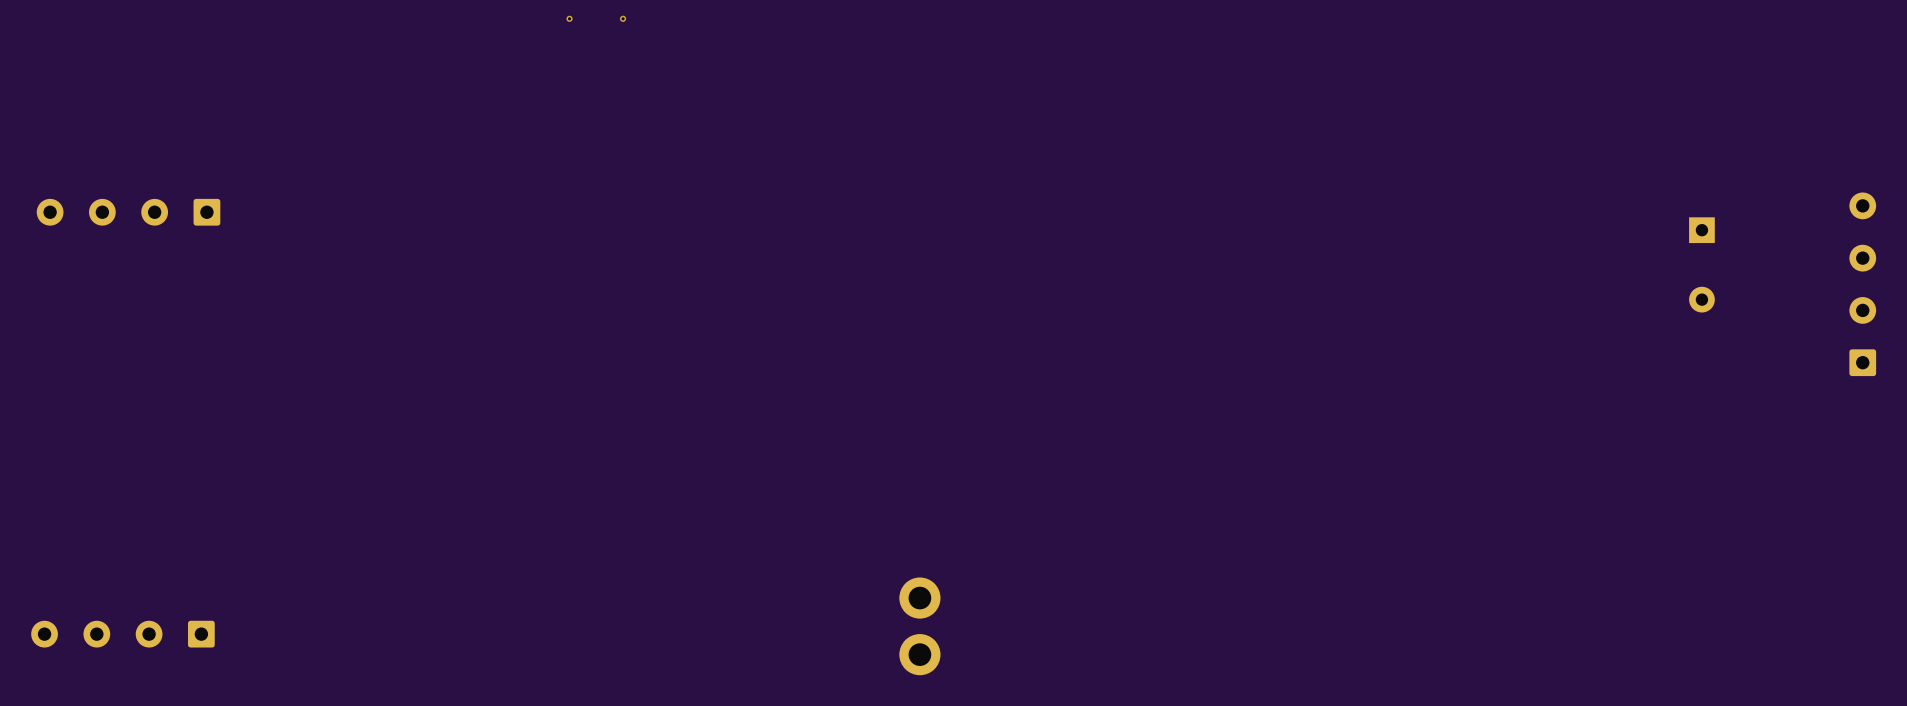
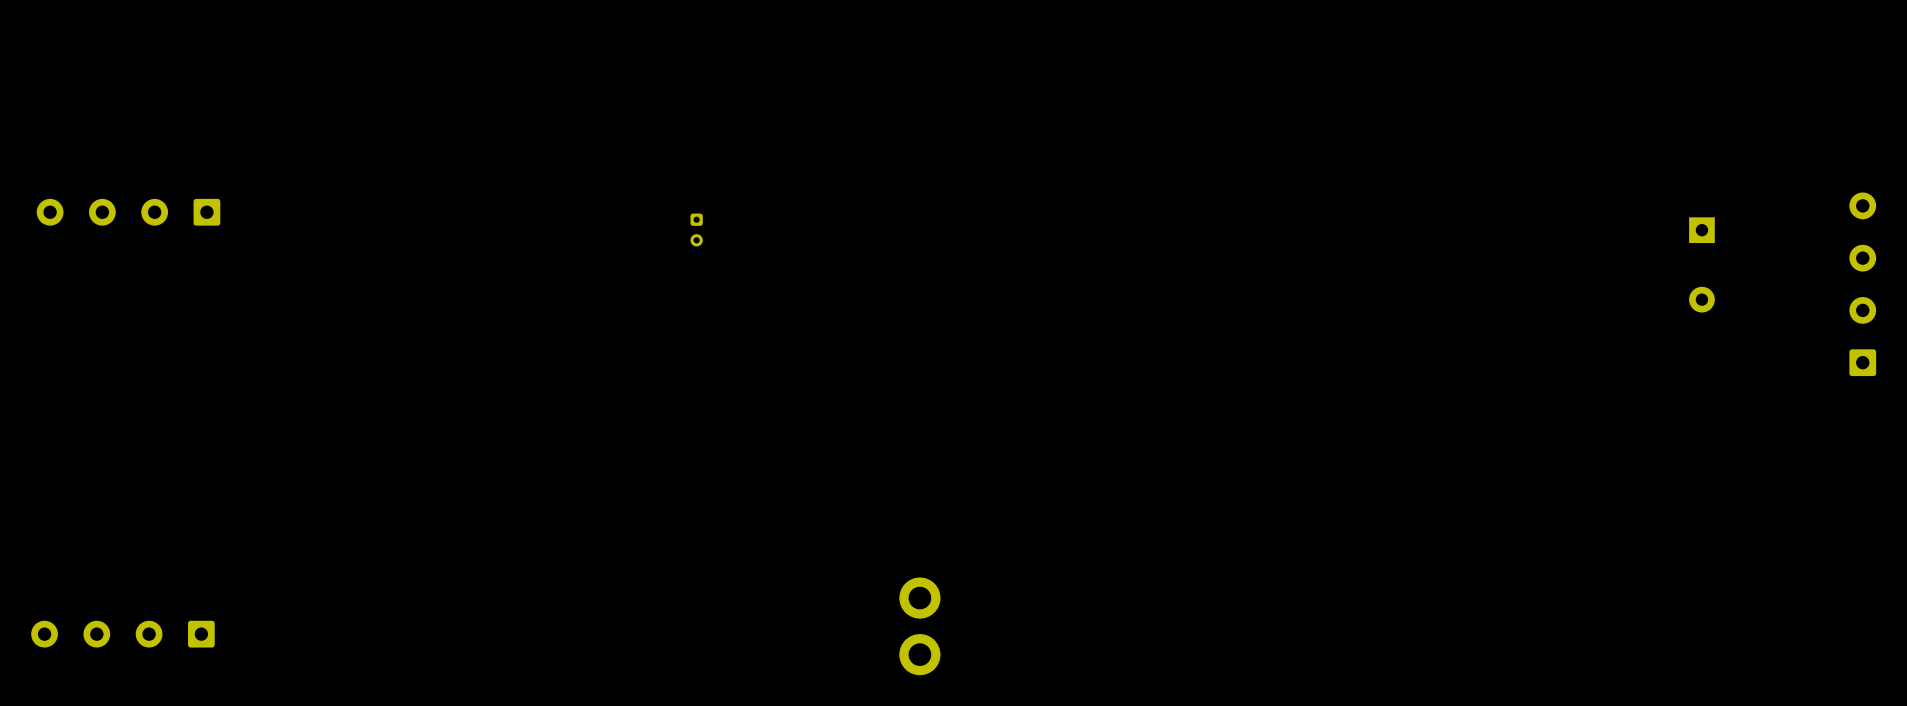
via: (569, 18) -> none
via: (623, 18) -> none
part: none -> (696, 230)

